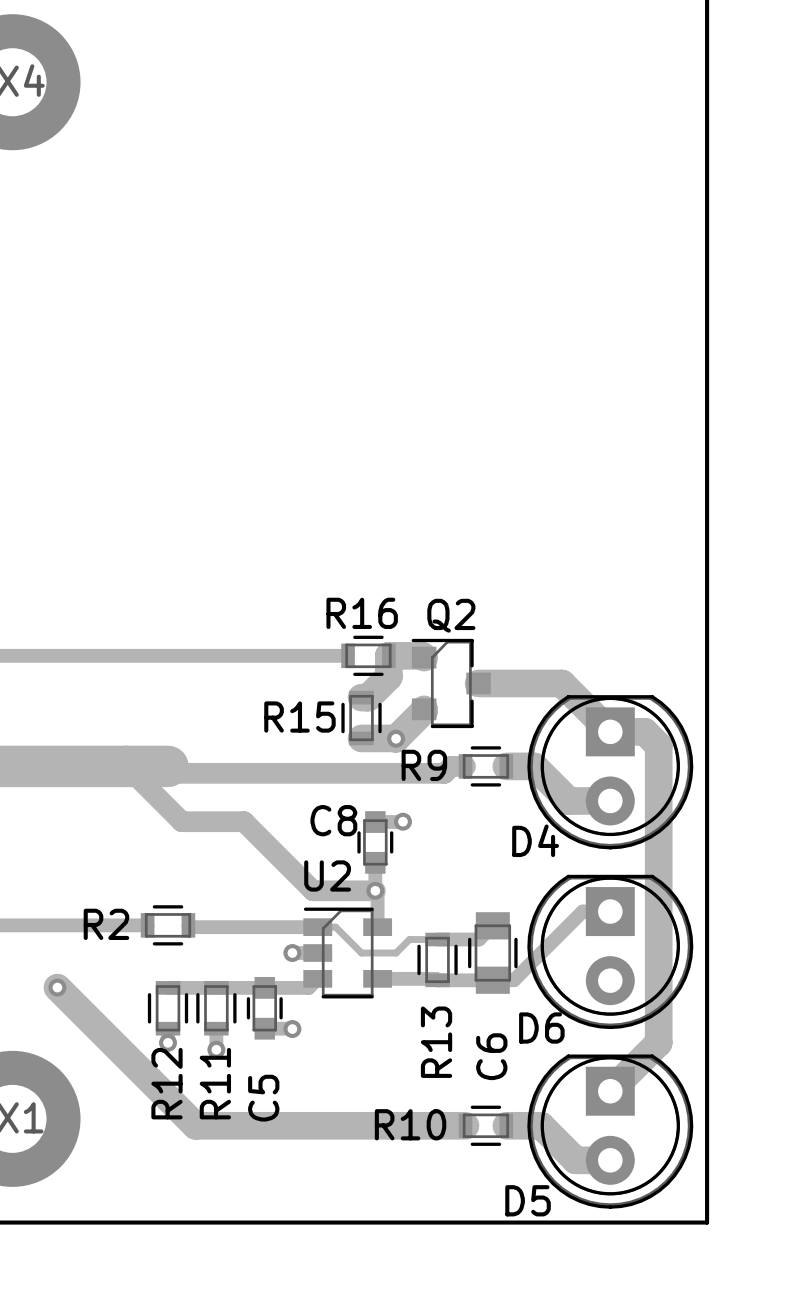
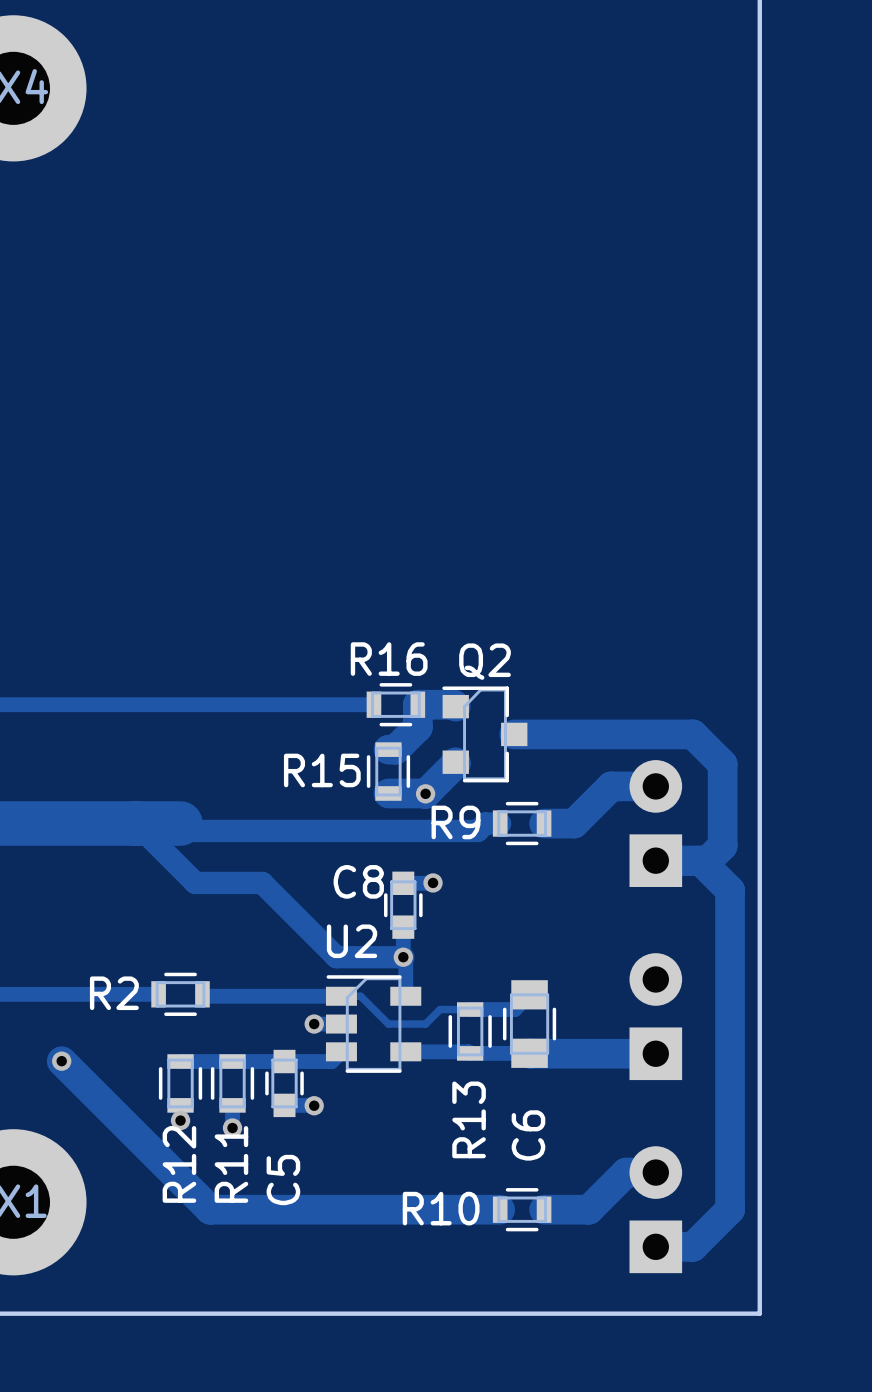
track: (561, 683) (610, 731) (644, 731) (658, 745) (658, 1042) (610, 1091) -> (603, 734) (692, 734) (722, 764) (722, 845) (707, 860) (655, 860)
track: (534, 766) (568, 800) (610, 800) -> (574, 823) (611, 786) (655, 786)
D4 side: top (610, 772) -> bottom (655, 823)
track: none -> (700, 860) (730, 890) (730, 1209) (692, 1246) (655, 1246)
track: (610, 911) (582, 911) (514, 980) (492, 980) -> (655, 1053) (529, 1053)
D6 side: top (610, 951) -> bottom (655, 1016)
track: (541, 1125) (575, 1160) (610, 1160) -> (581, 1209) (588, 1209) (626, 1172) (655, 1172)
D5 side: top (610, 1131) -> bottom (655, 1209)

